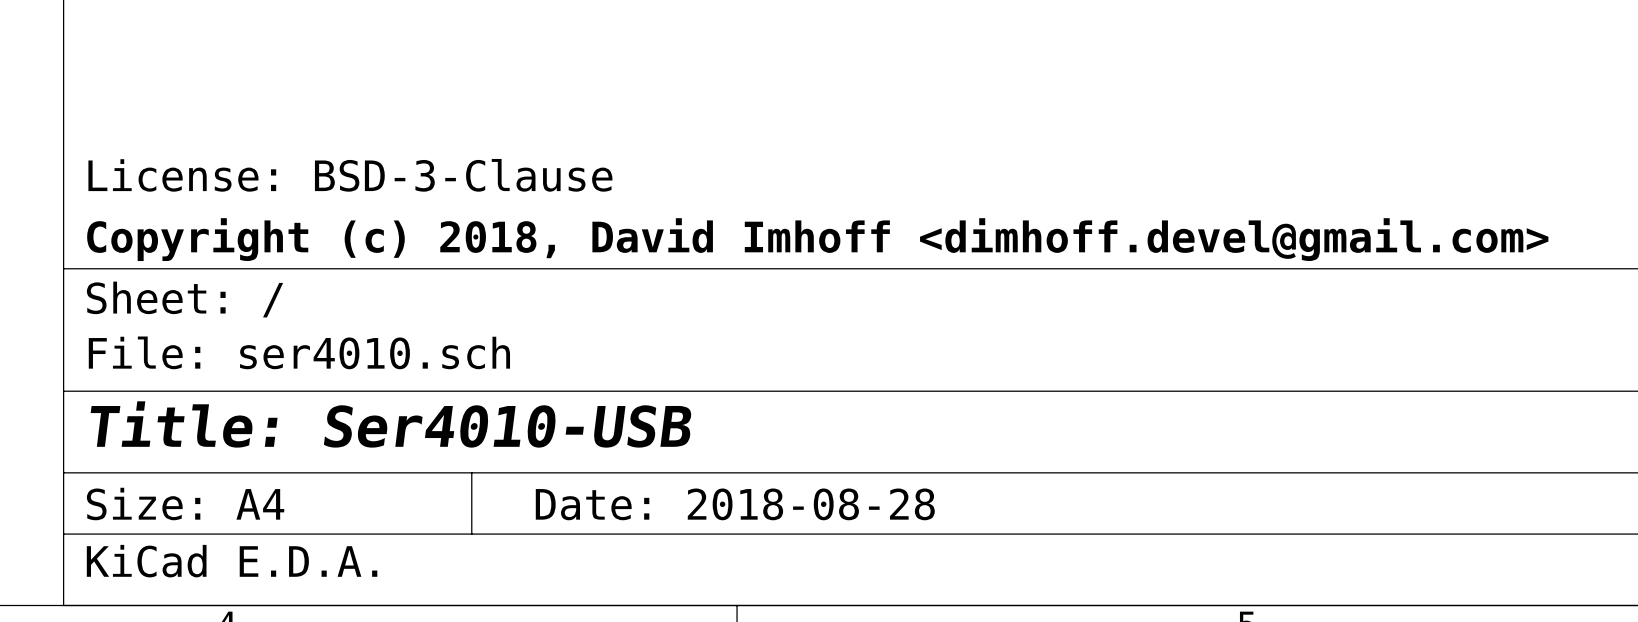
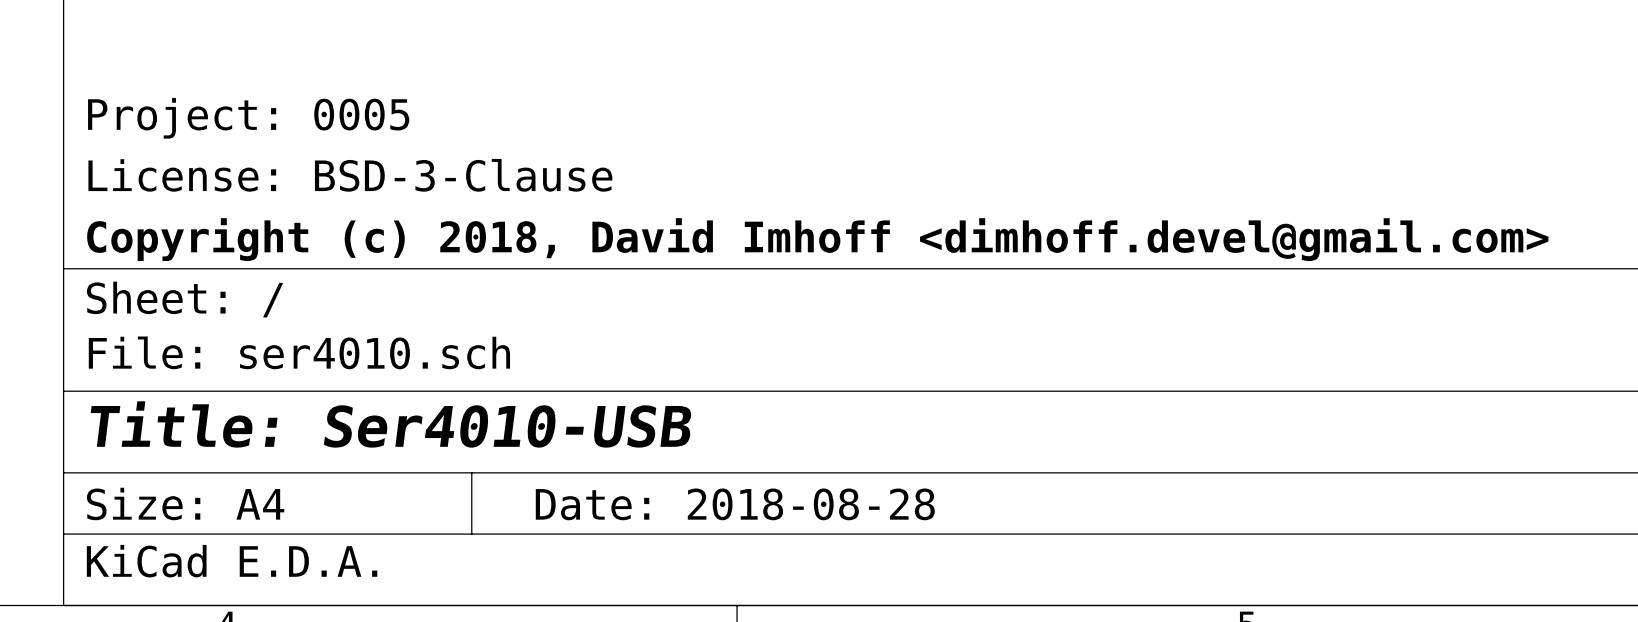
title block: none -> Project: 0005 (248, 118)

